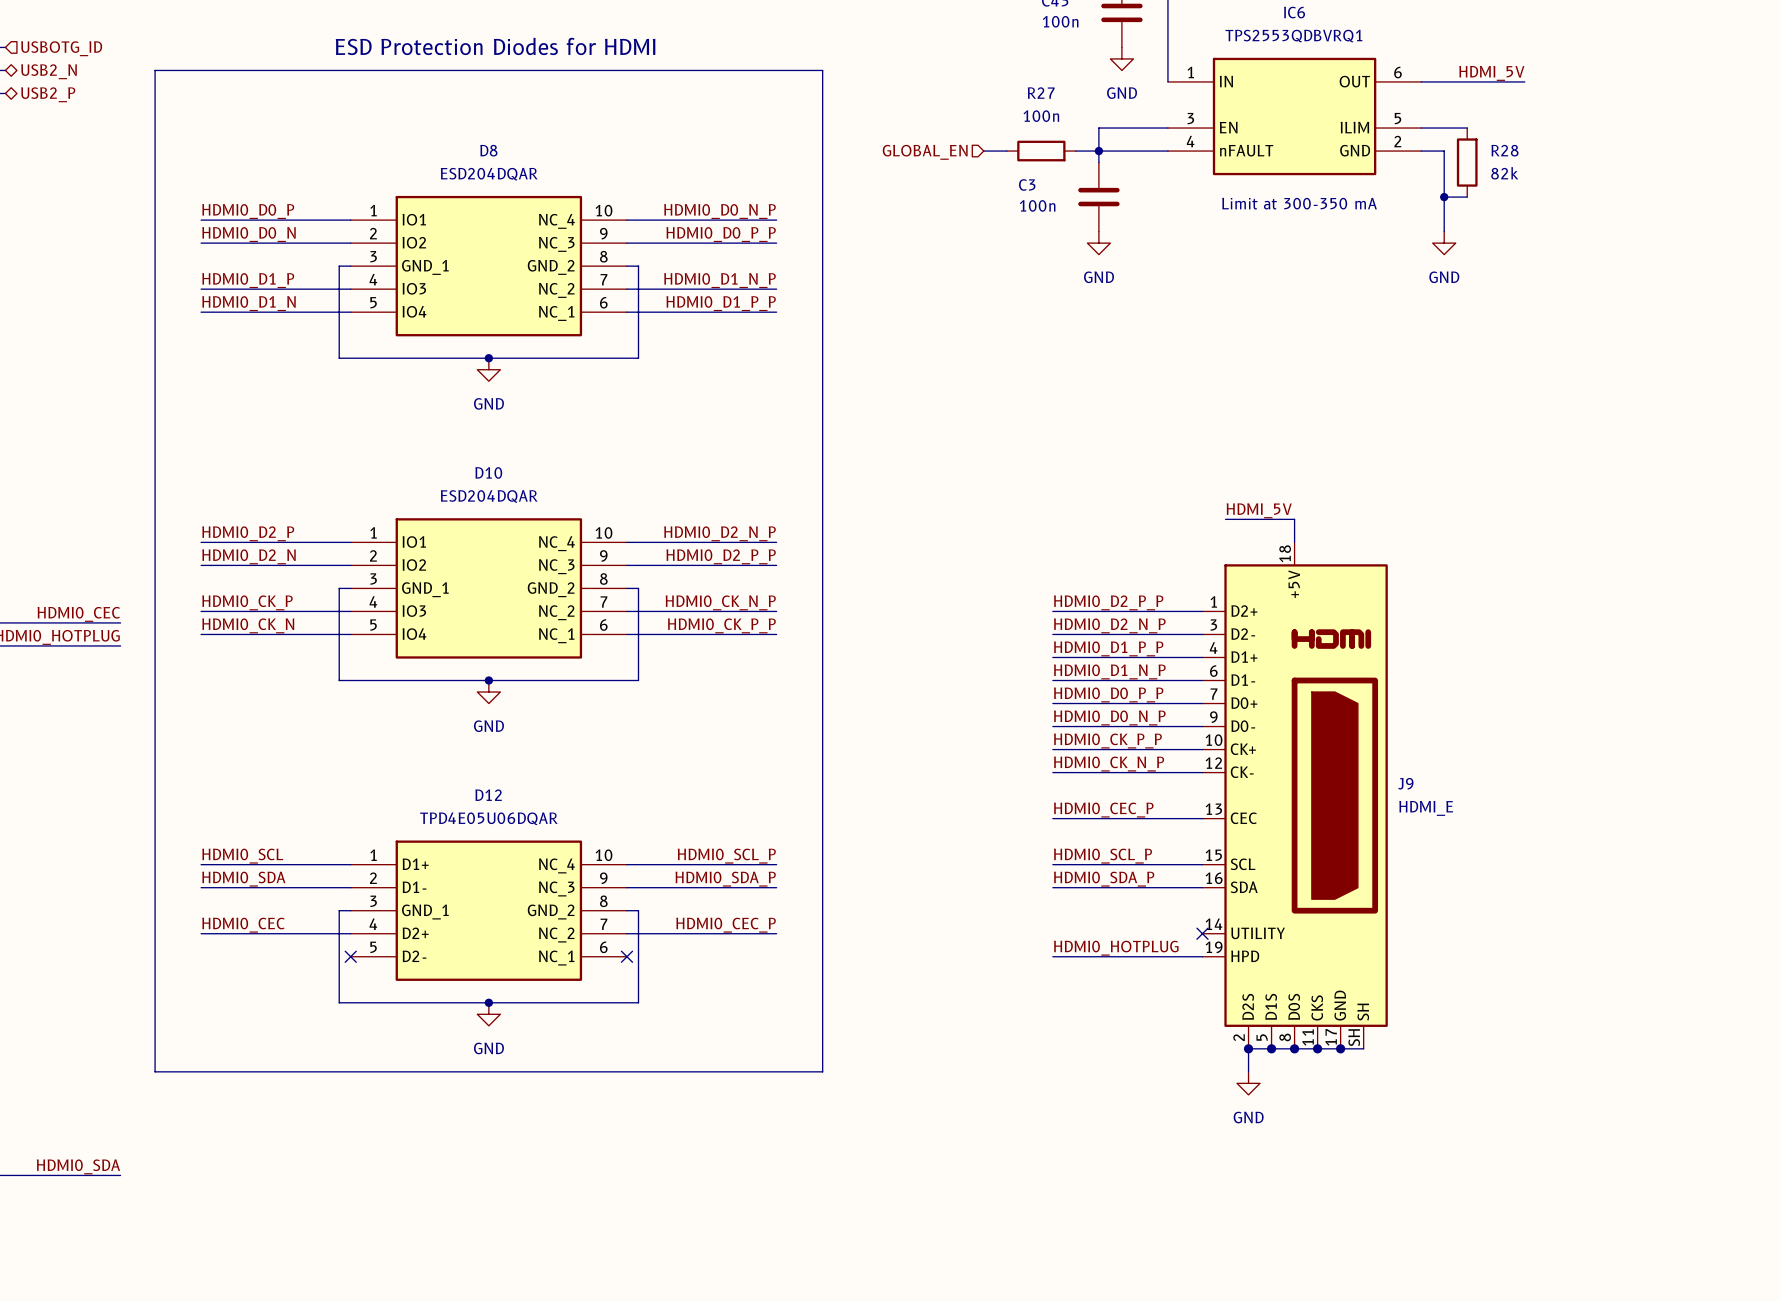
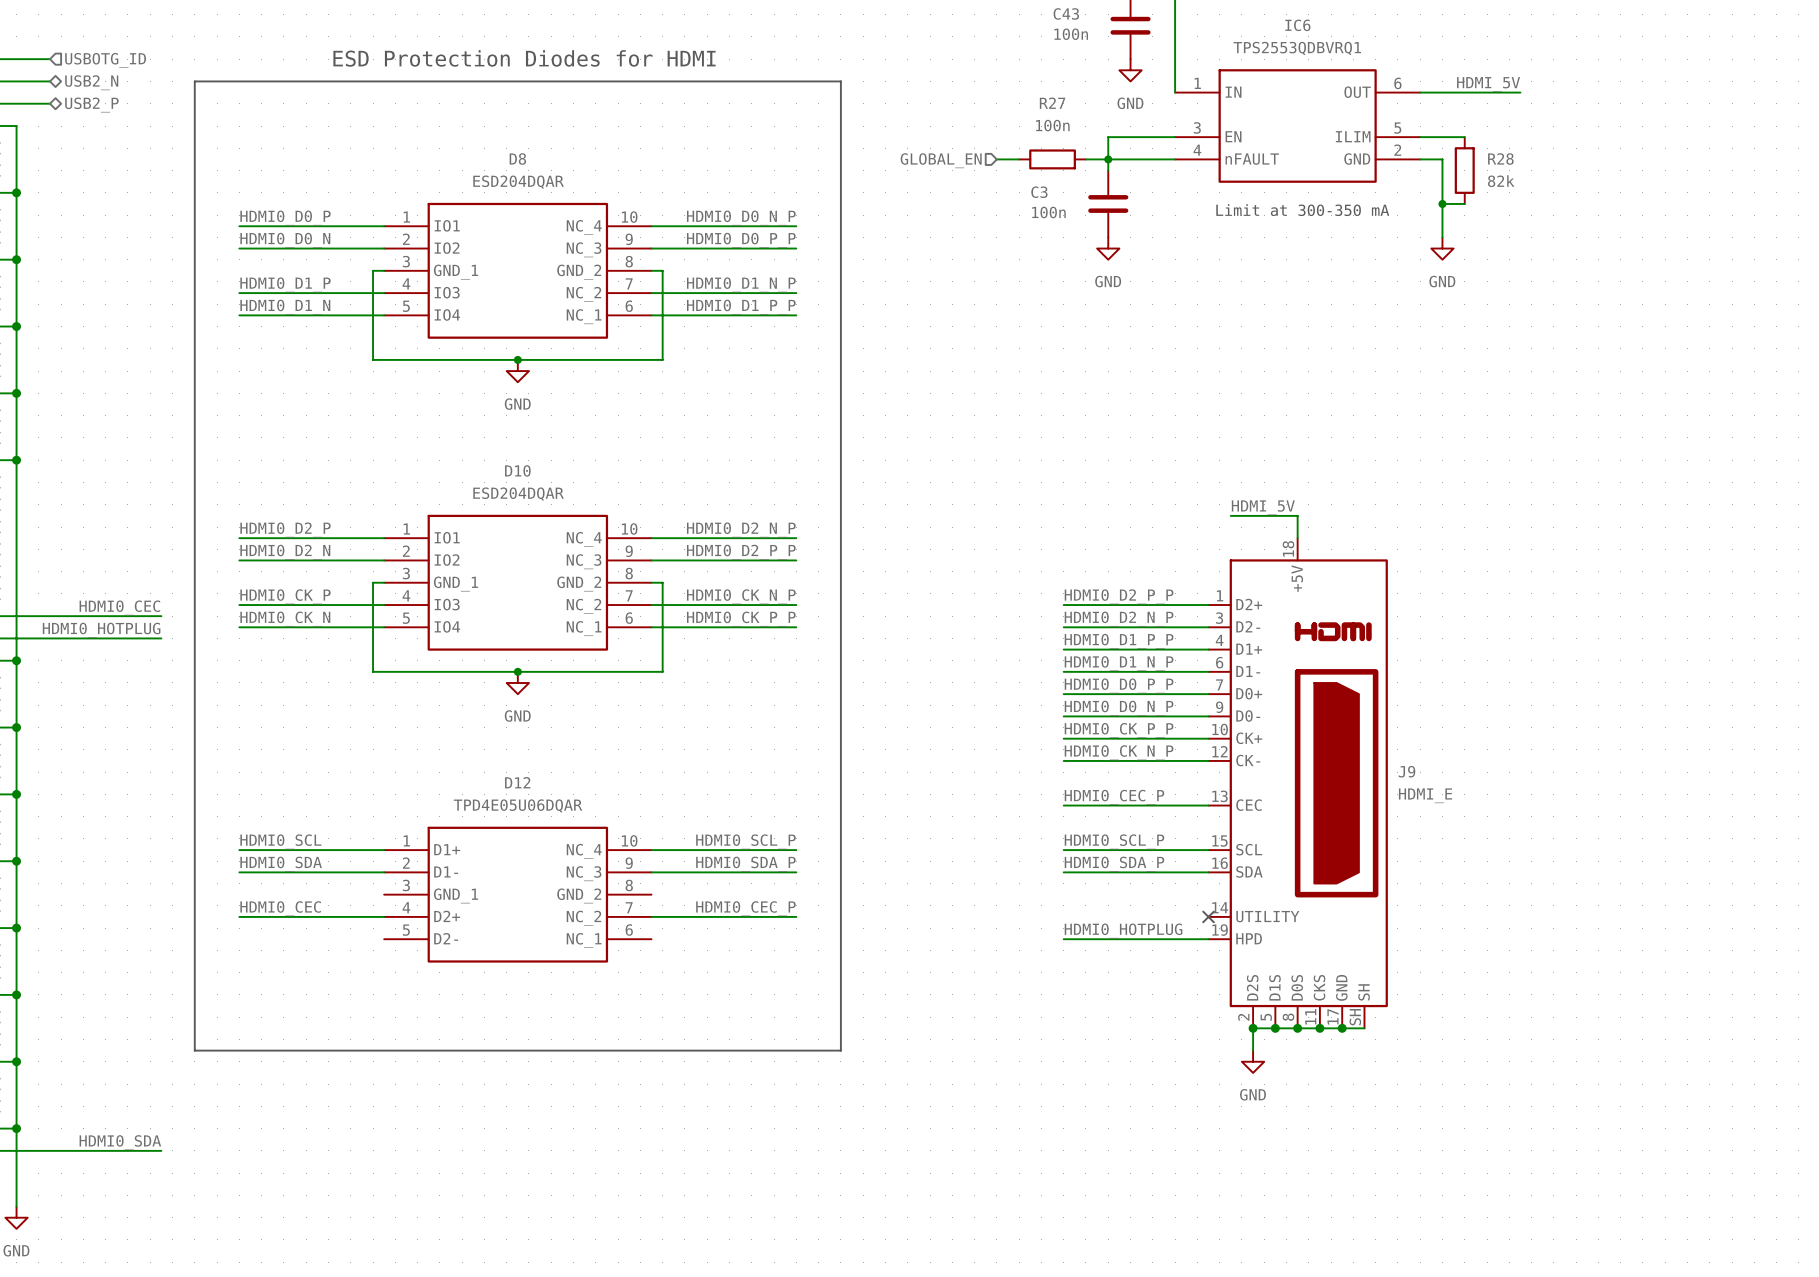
wire: (350, 910) (339, 910) (339, 1002) (638, 1002) (638, 910) (626, 910) -> none
no-connect mark: (350, 956) -> none
no-connect mark: (626, 956) -> none
junction: (488, 1002) -> none
power symbol: GND (488, 1014) -> none

